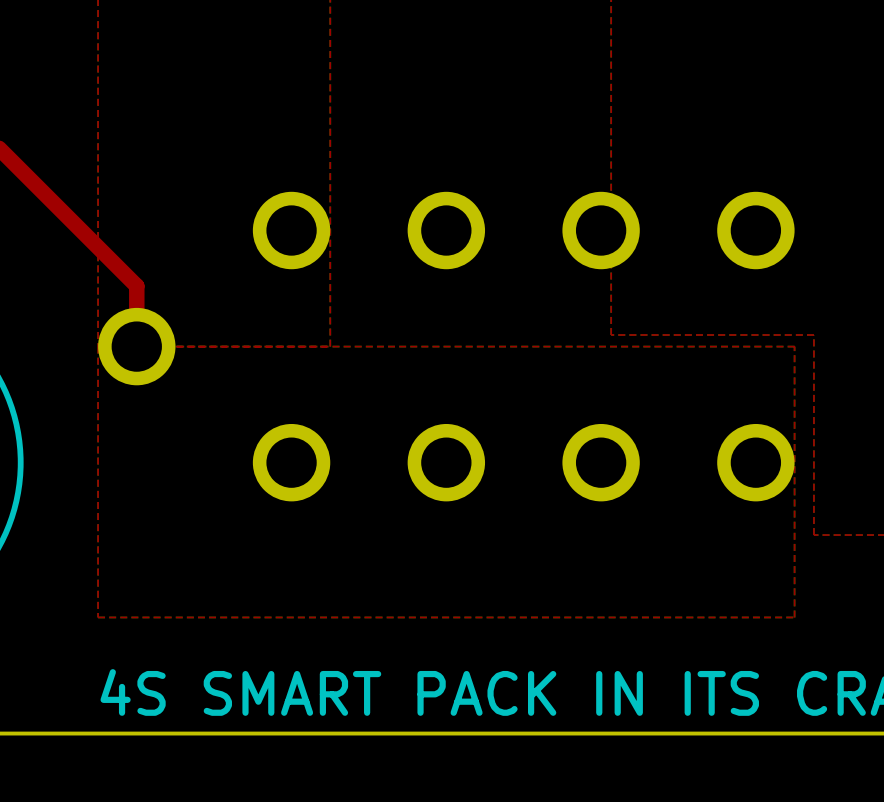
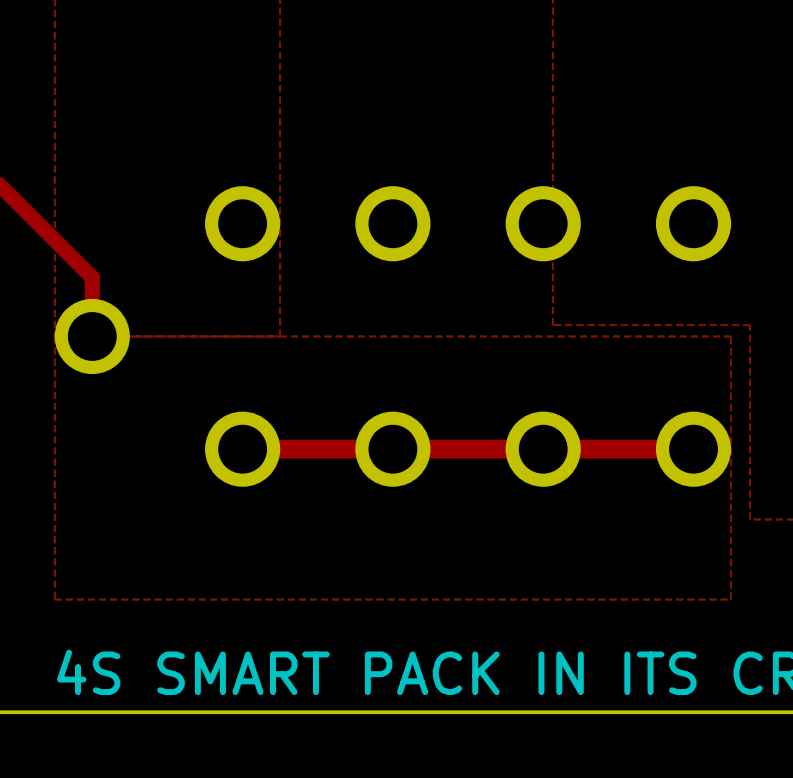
top track: none -> (242, 449) (693, 449)

